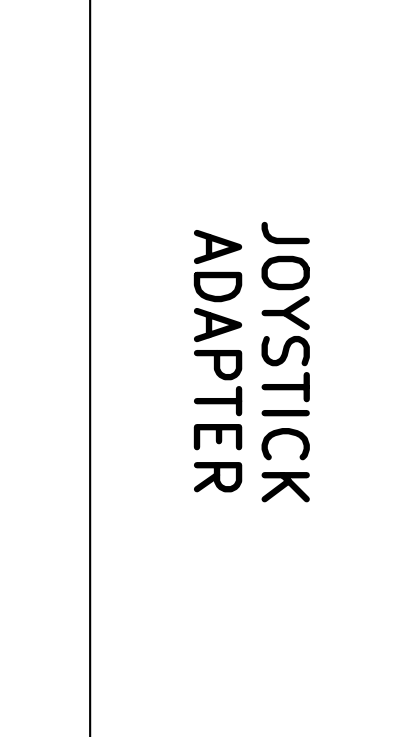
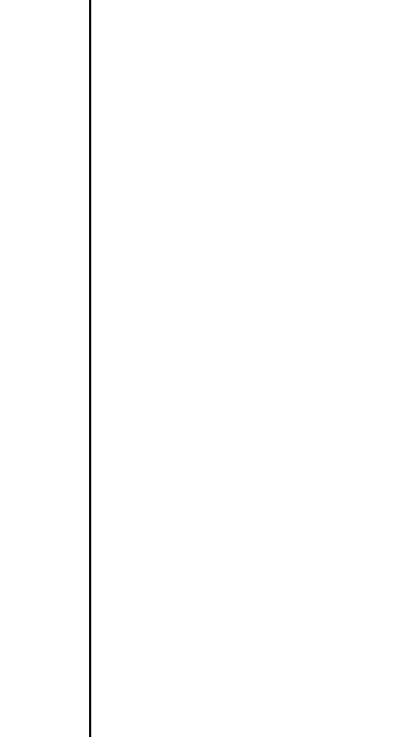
text: ADAPTER (218, 361) -> none
text: JOYSTICK (285, 362) -> none

